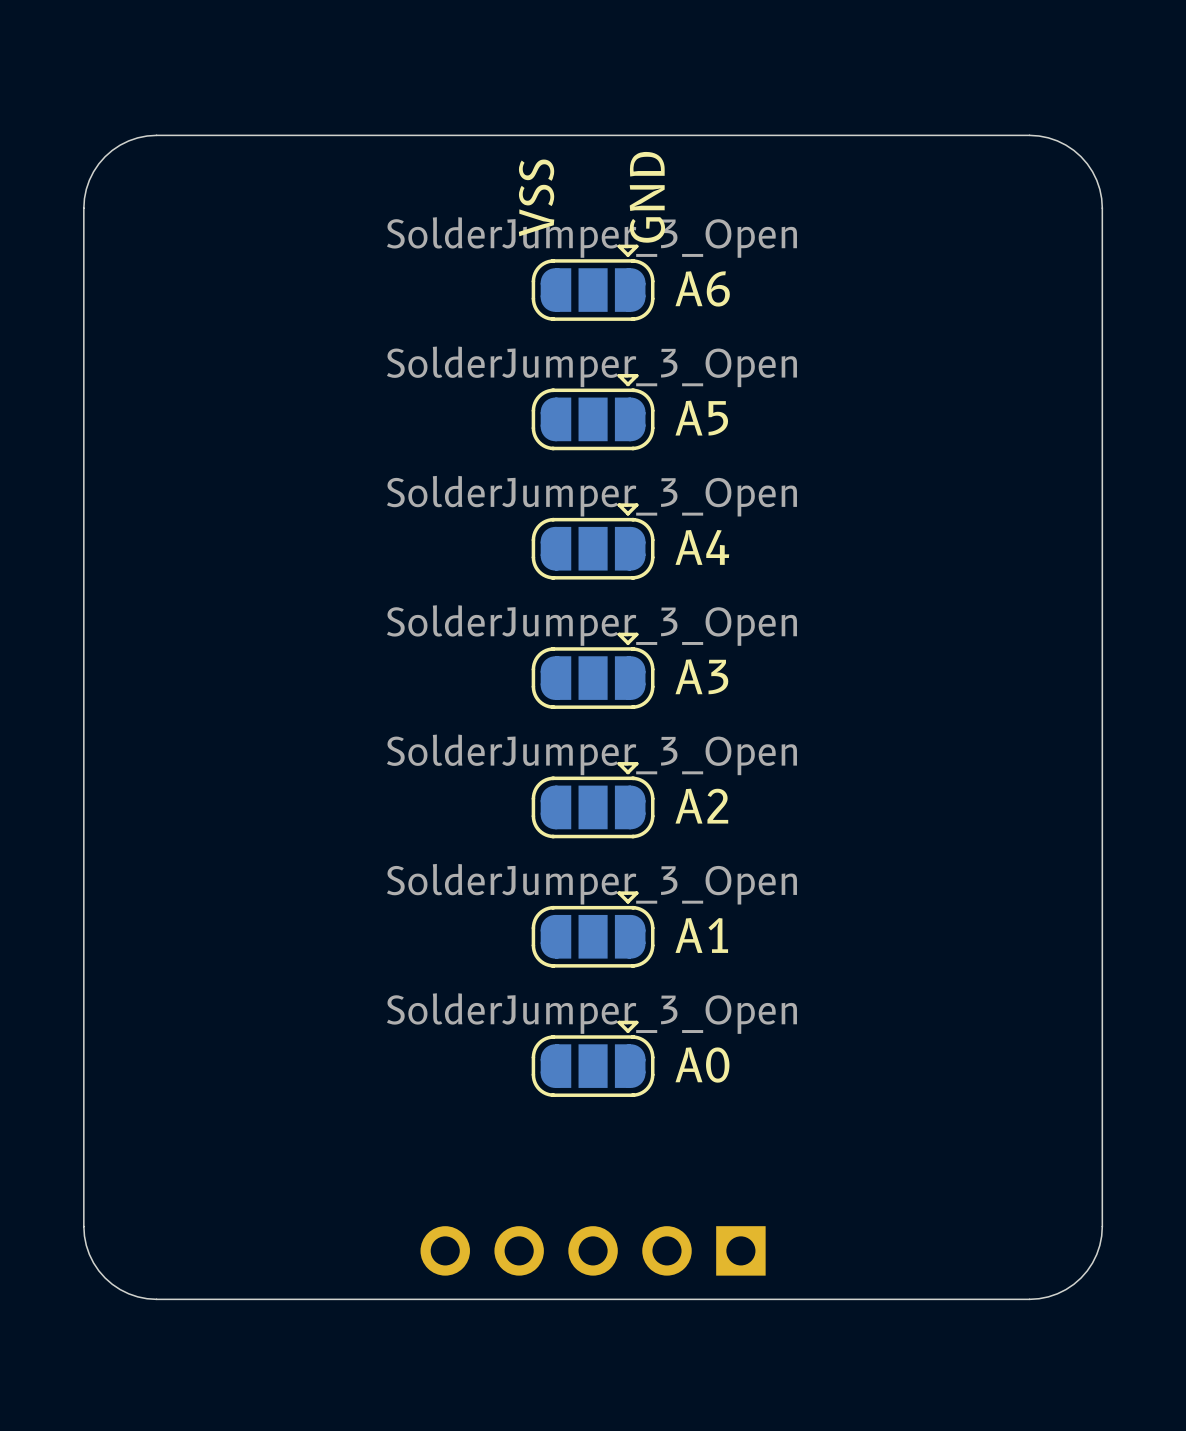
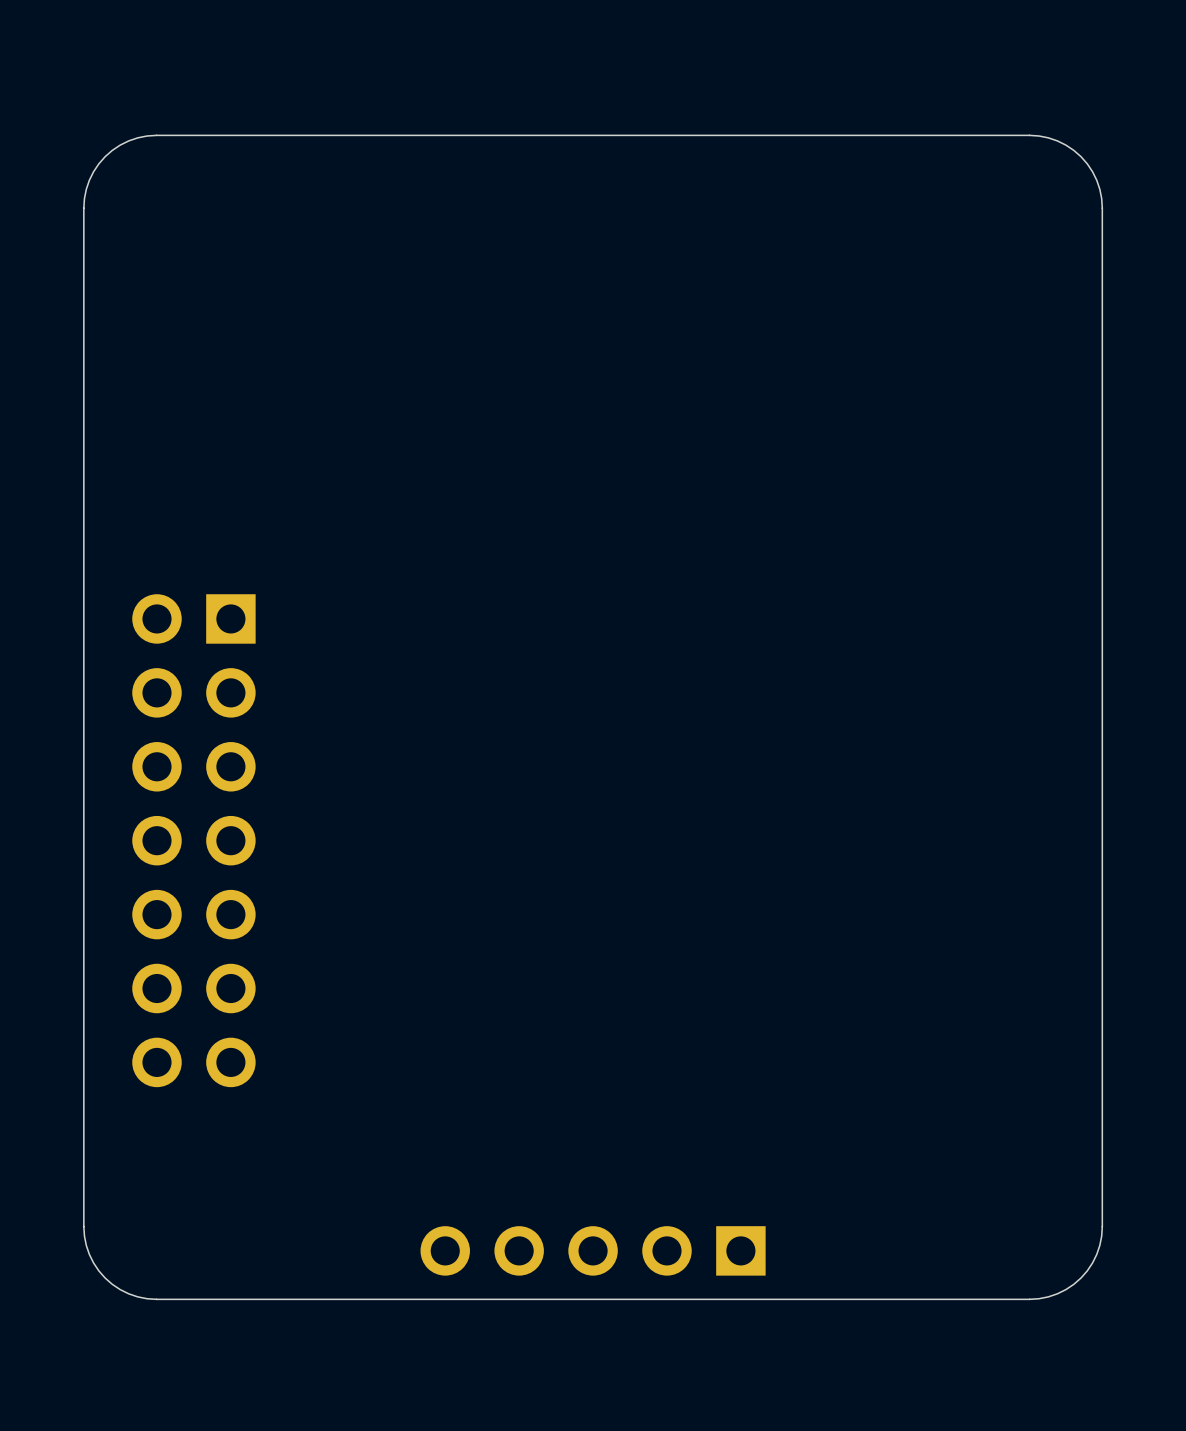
text: VSS (536, 197) -> none
text: GND (647, 197) -> none
part: SolderJumper_3_Open (593, 282) -> none
text: A6 (702, 288) -> none
part: SolderJumper_3_Open (593, 412) -> none
text: A5 (701, 418) -> none
part: SolderJumper_3_Open (593, 541) -> none
text: A4 (702, 547) -> none
part: SolderJumper_3_Open (593, 670) -> none
text: A3 (701, 676) -> none
part: SolderJumper_3_Open (593, 800) -> none
text: A2 (701, 806) -> none
part: none -> (193, 840)
part: SolderJumper_3_Open (593, 929) -> none
text: A1 (701, 935) -> none
part: SolderJumper_3_Open (593, 1058) -> none
text: A0 (702, 1065) -> none

